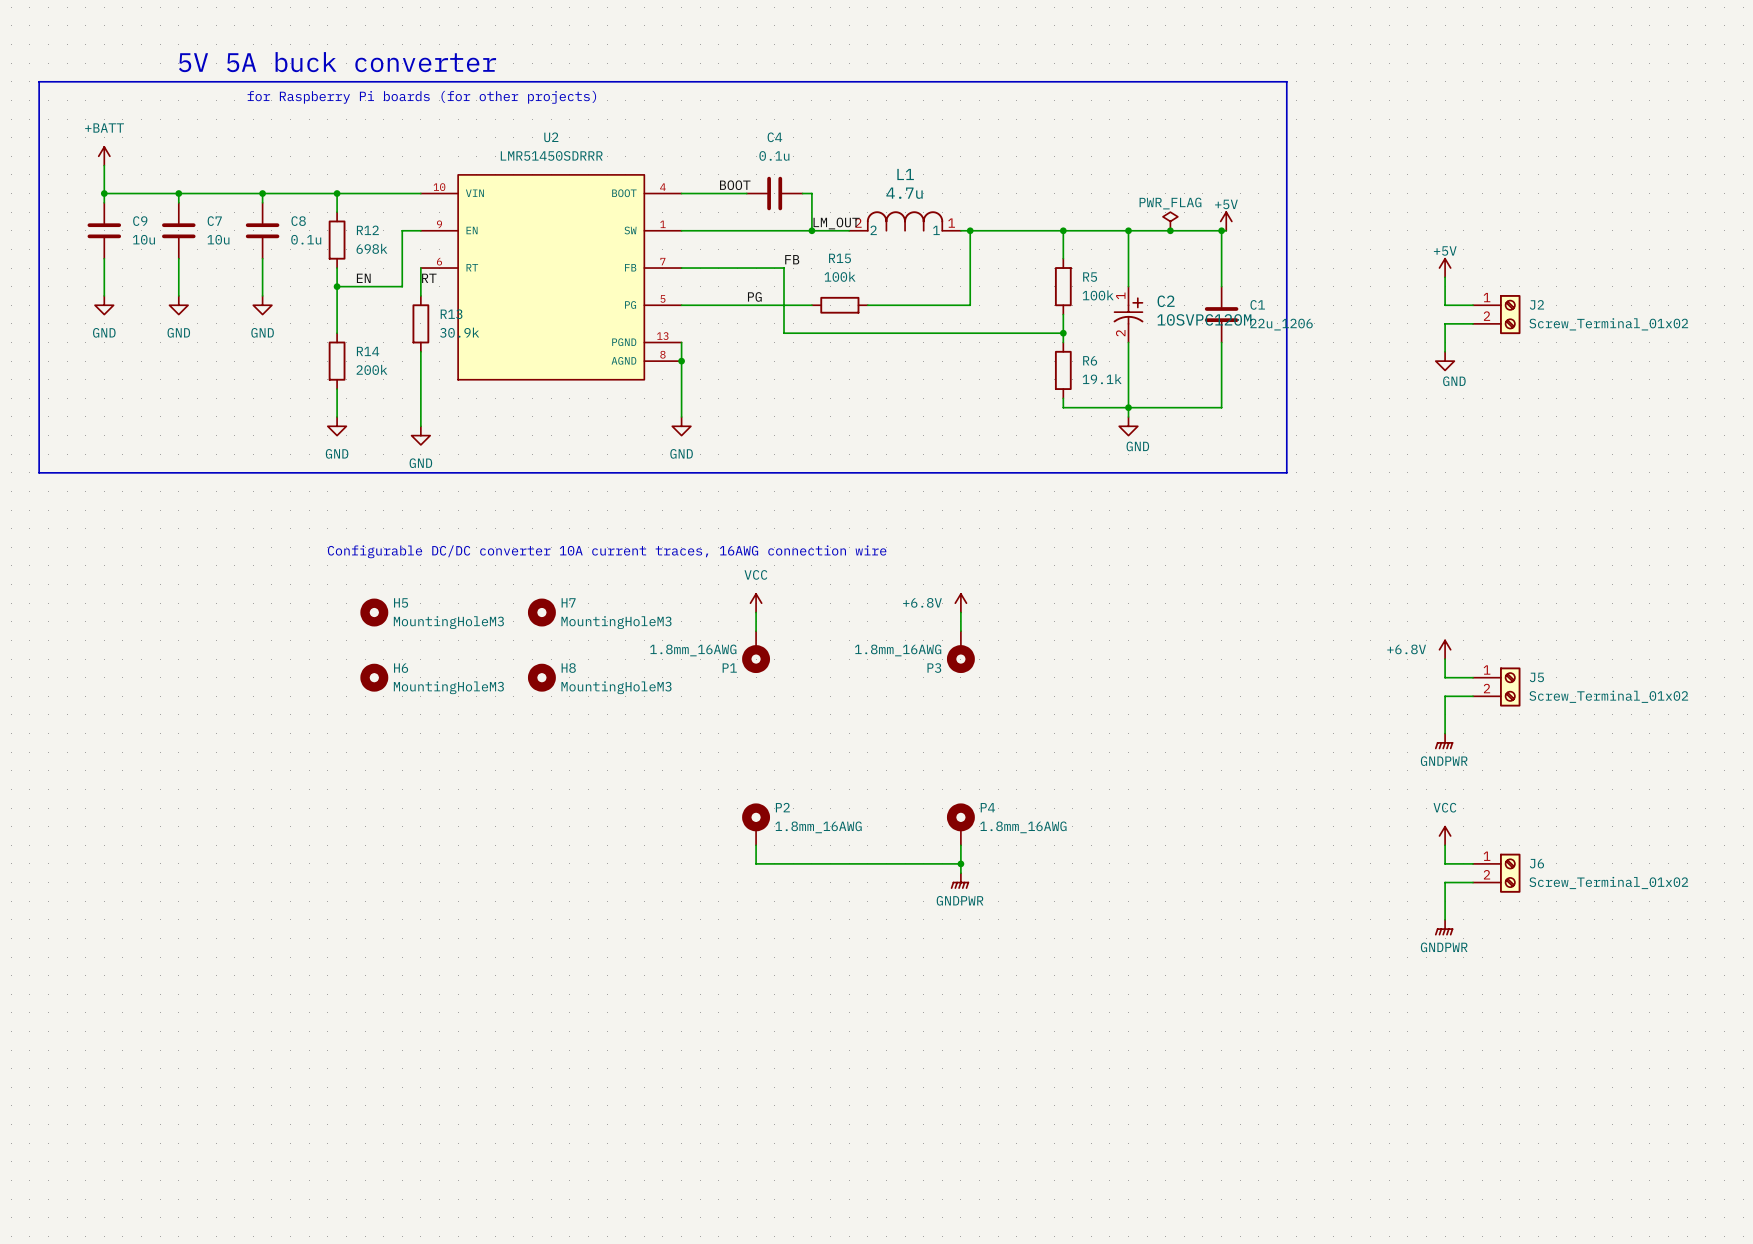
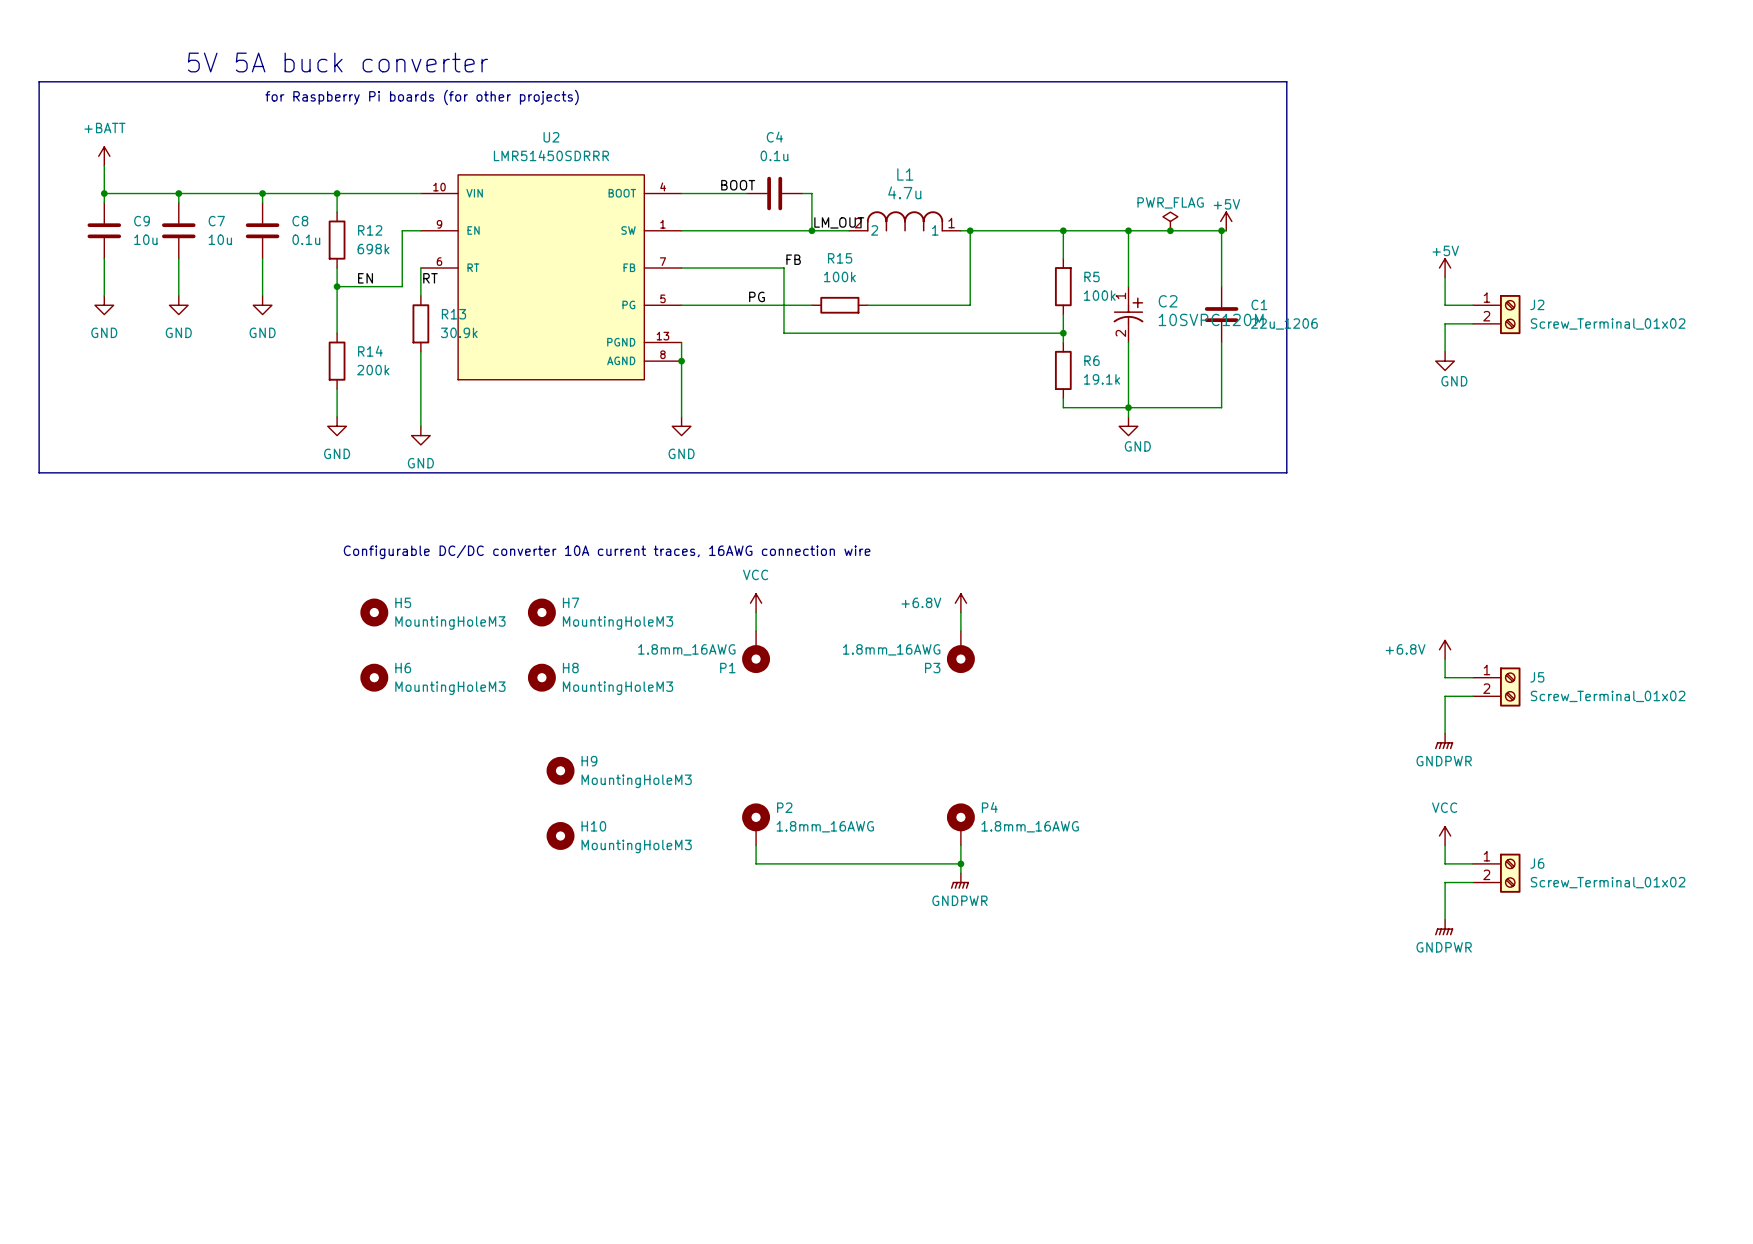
H9: none -> MountingHoleM3 (560, 770)
H10: none -> MountingHoleM3 (560, 835)

